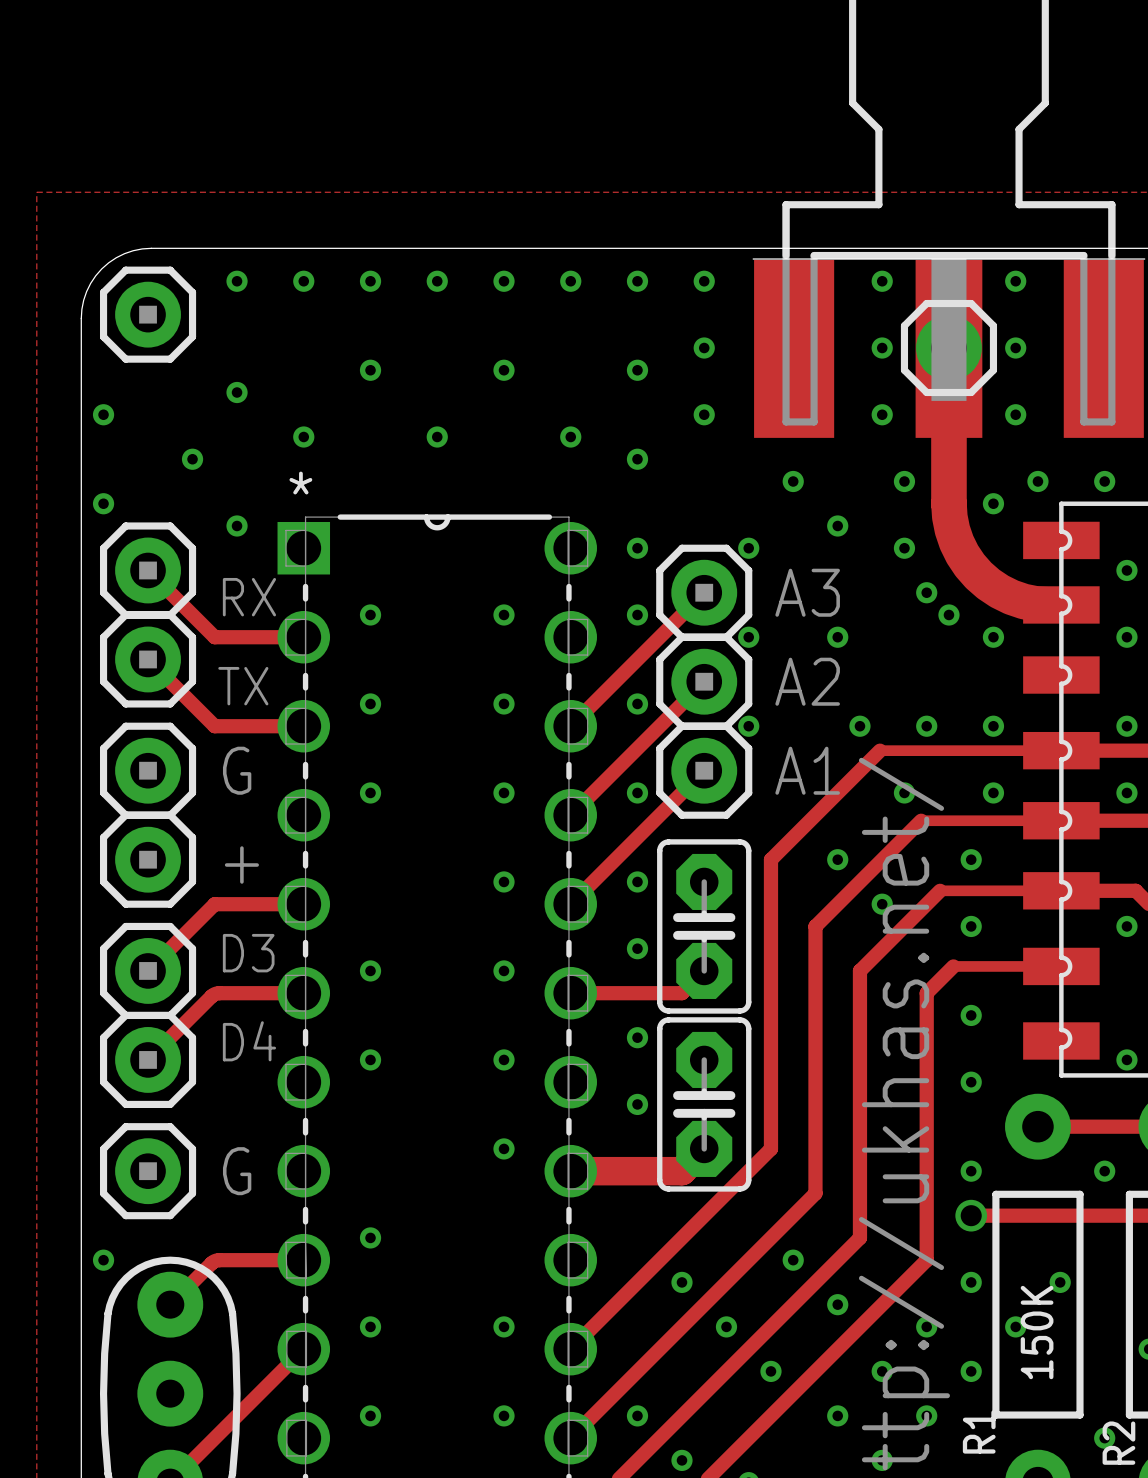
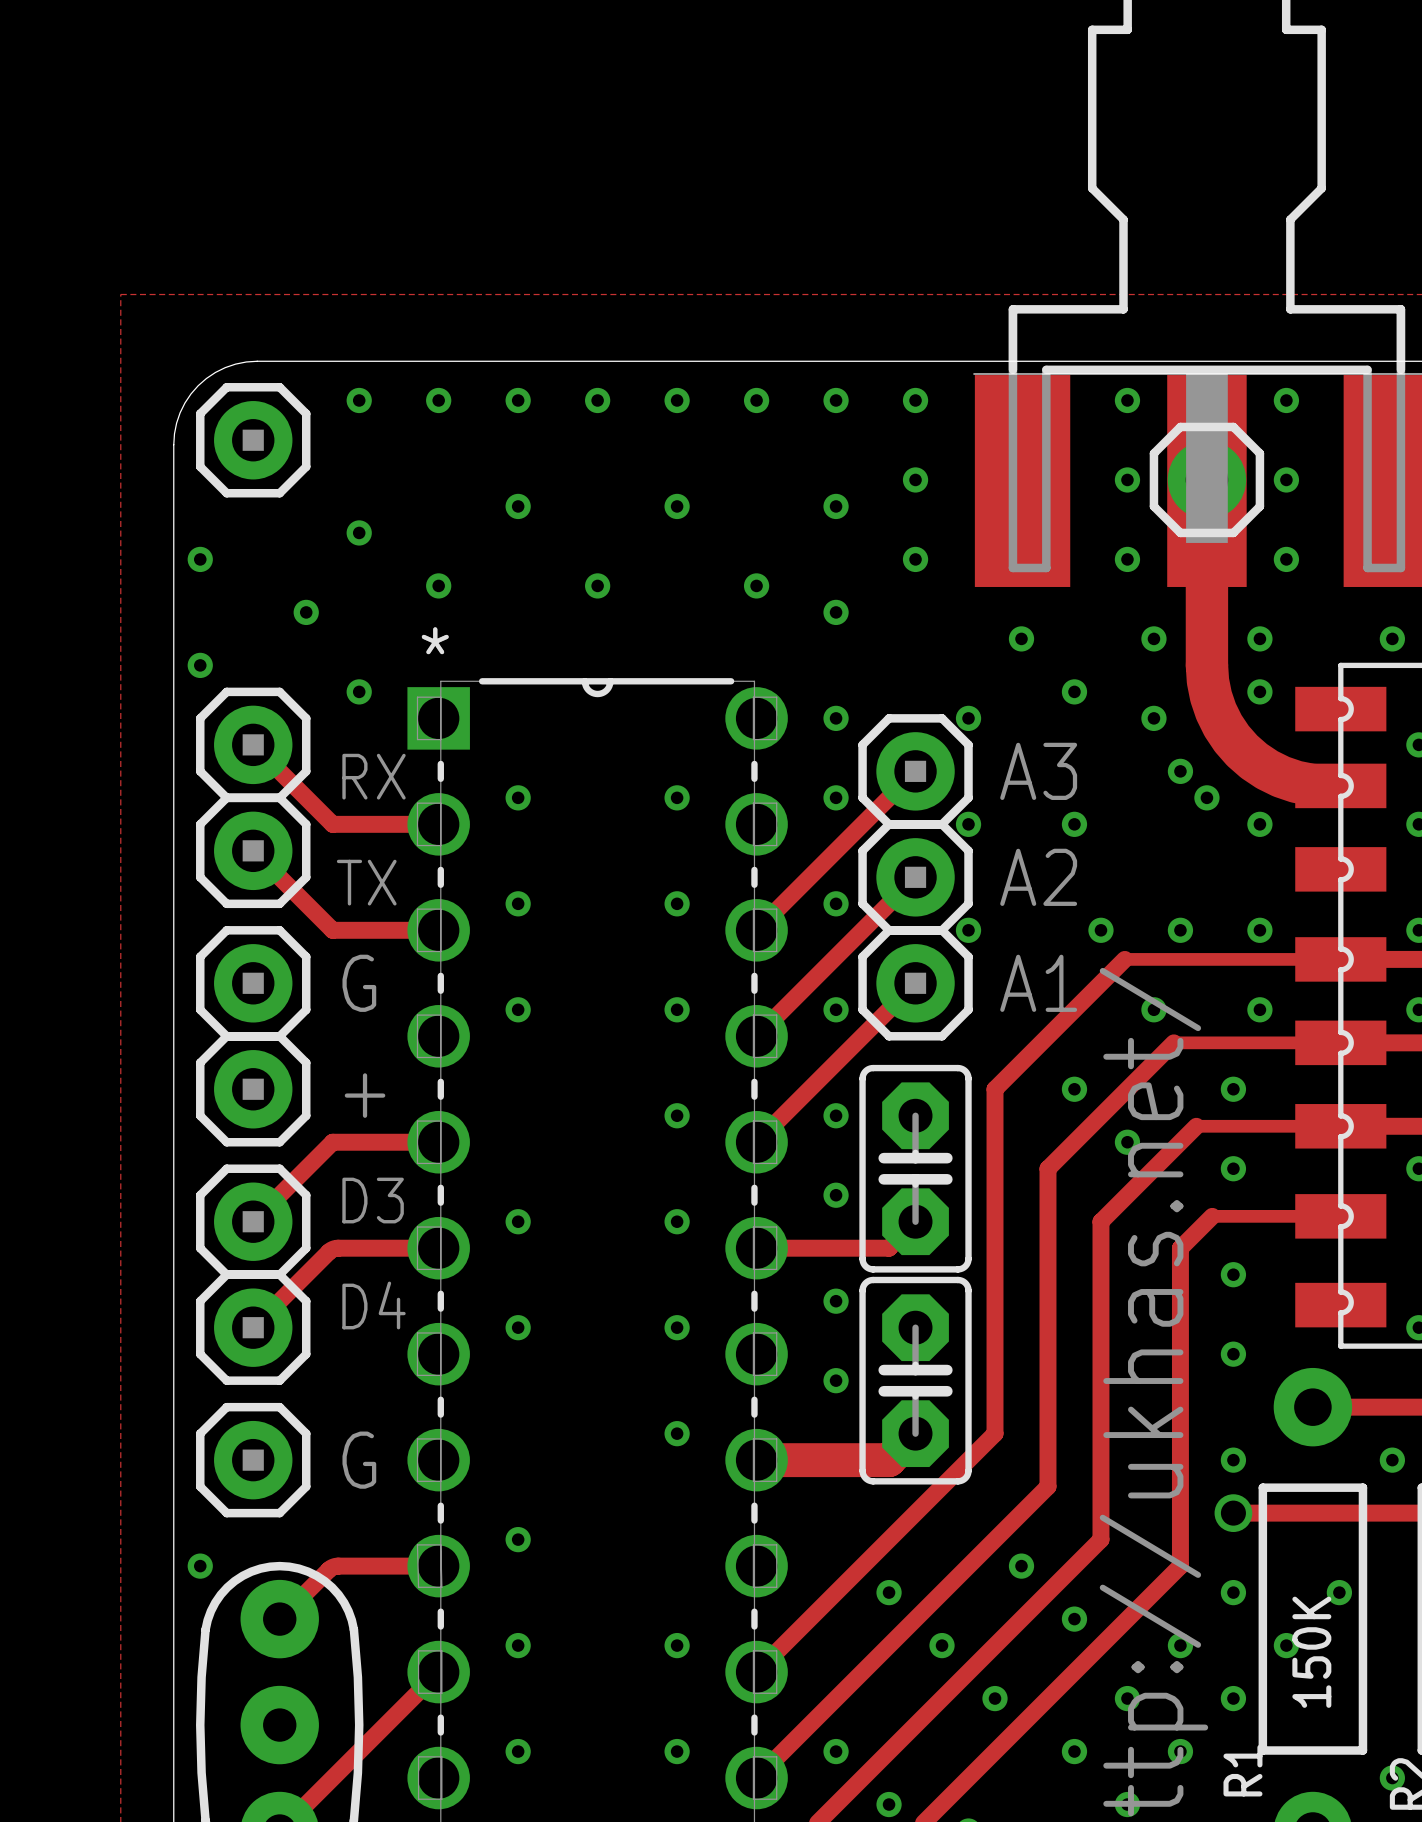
via: none -> (1259, 638)
via: (1037, 481) -> none
via: (993, 503) -> none
via: none -> (1259, 691)

